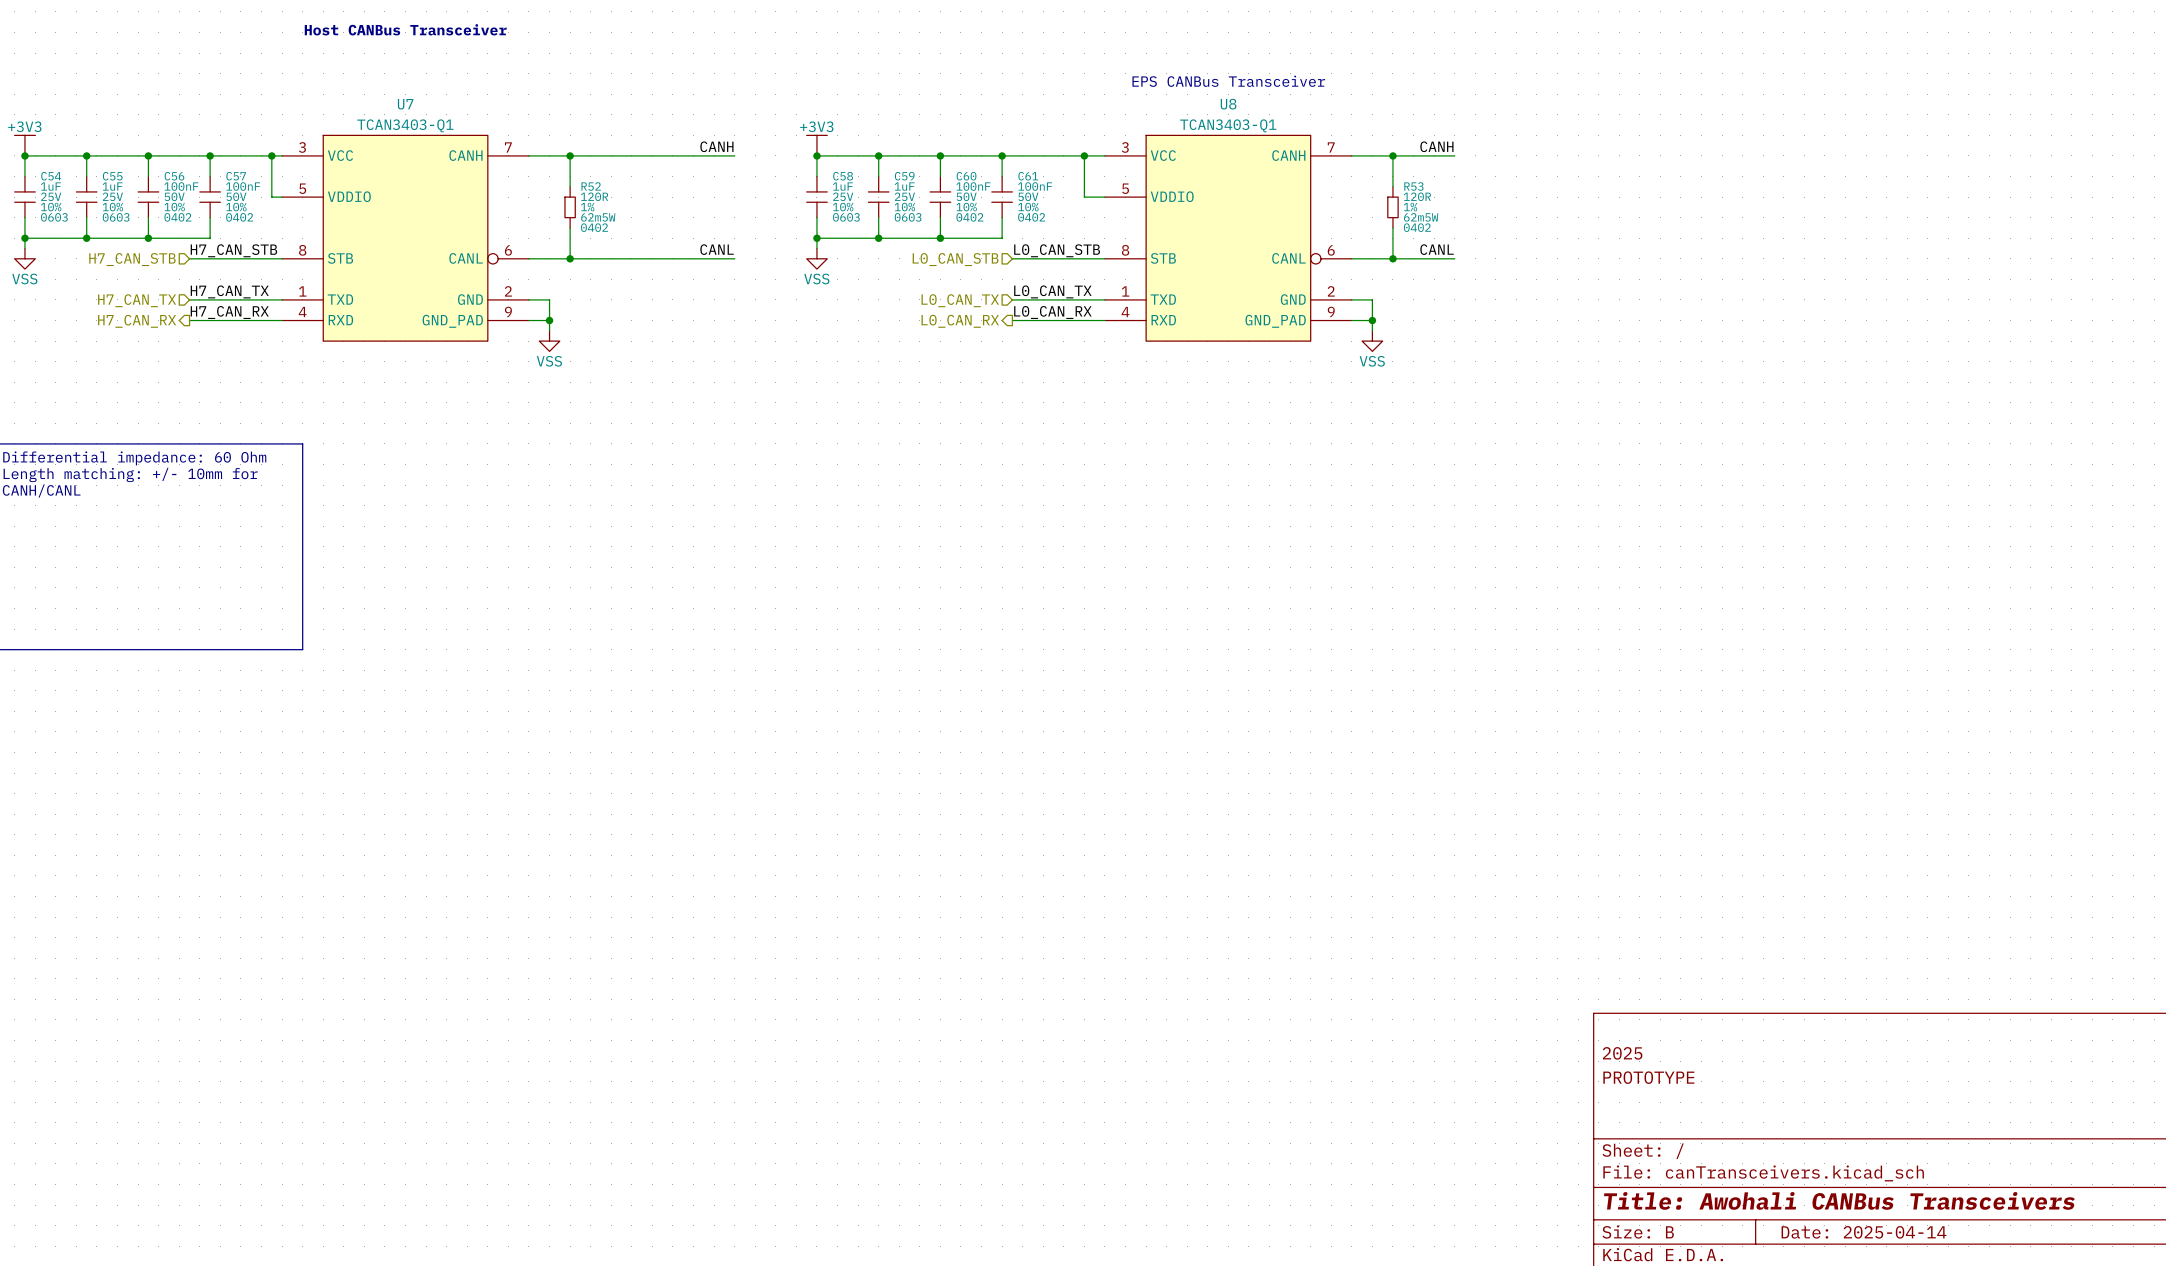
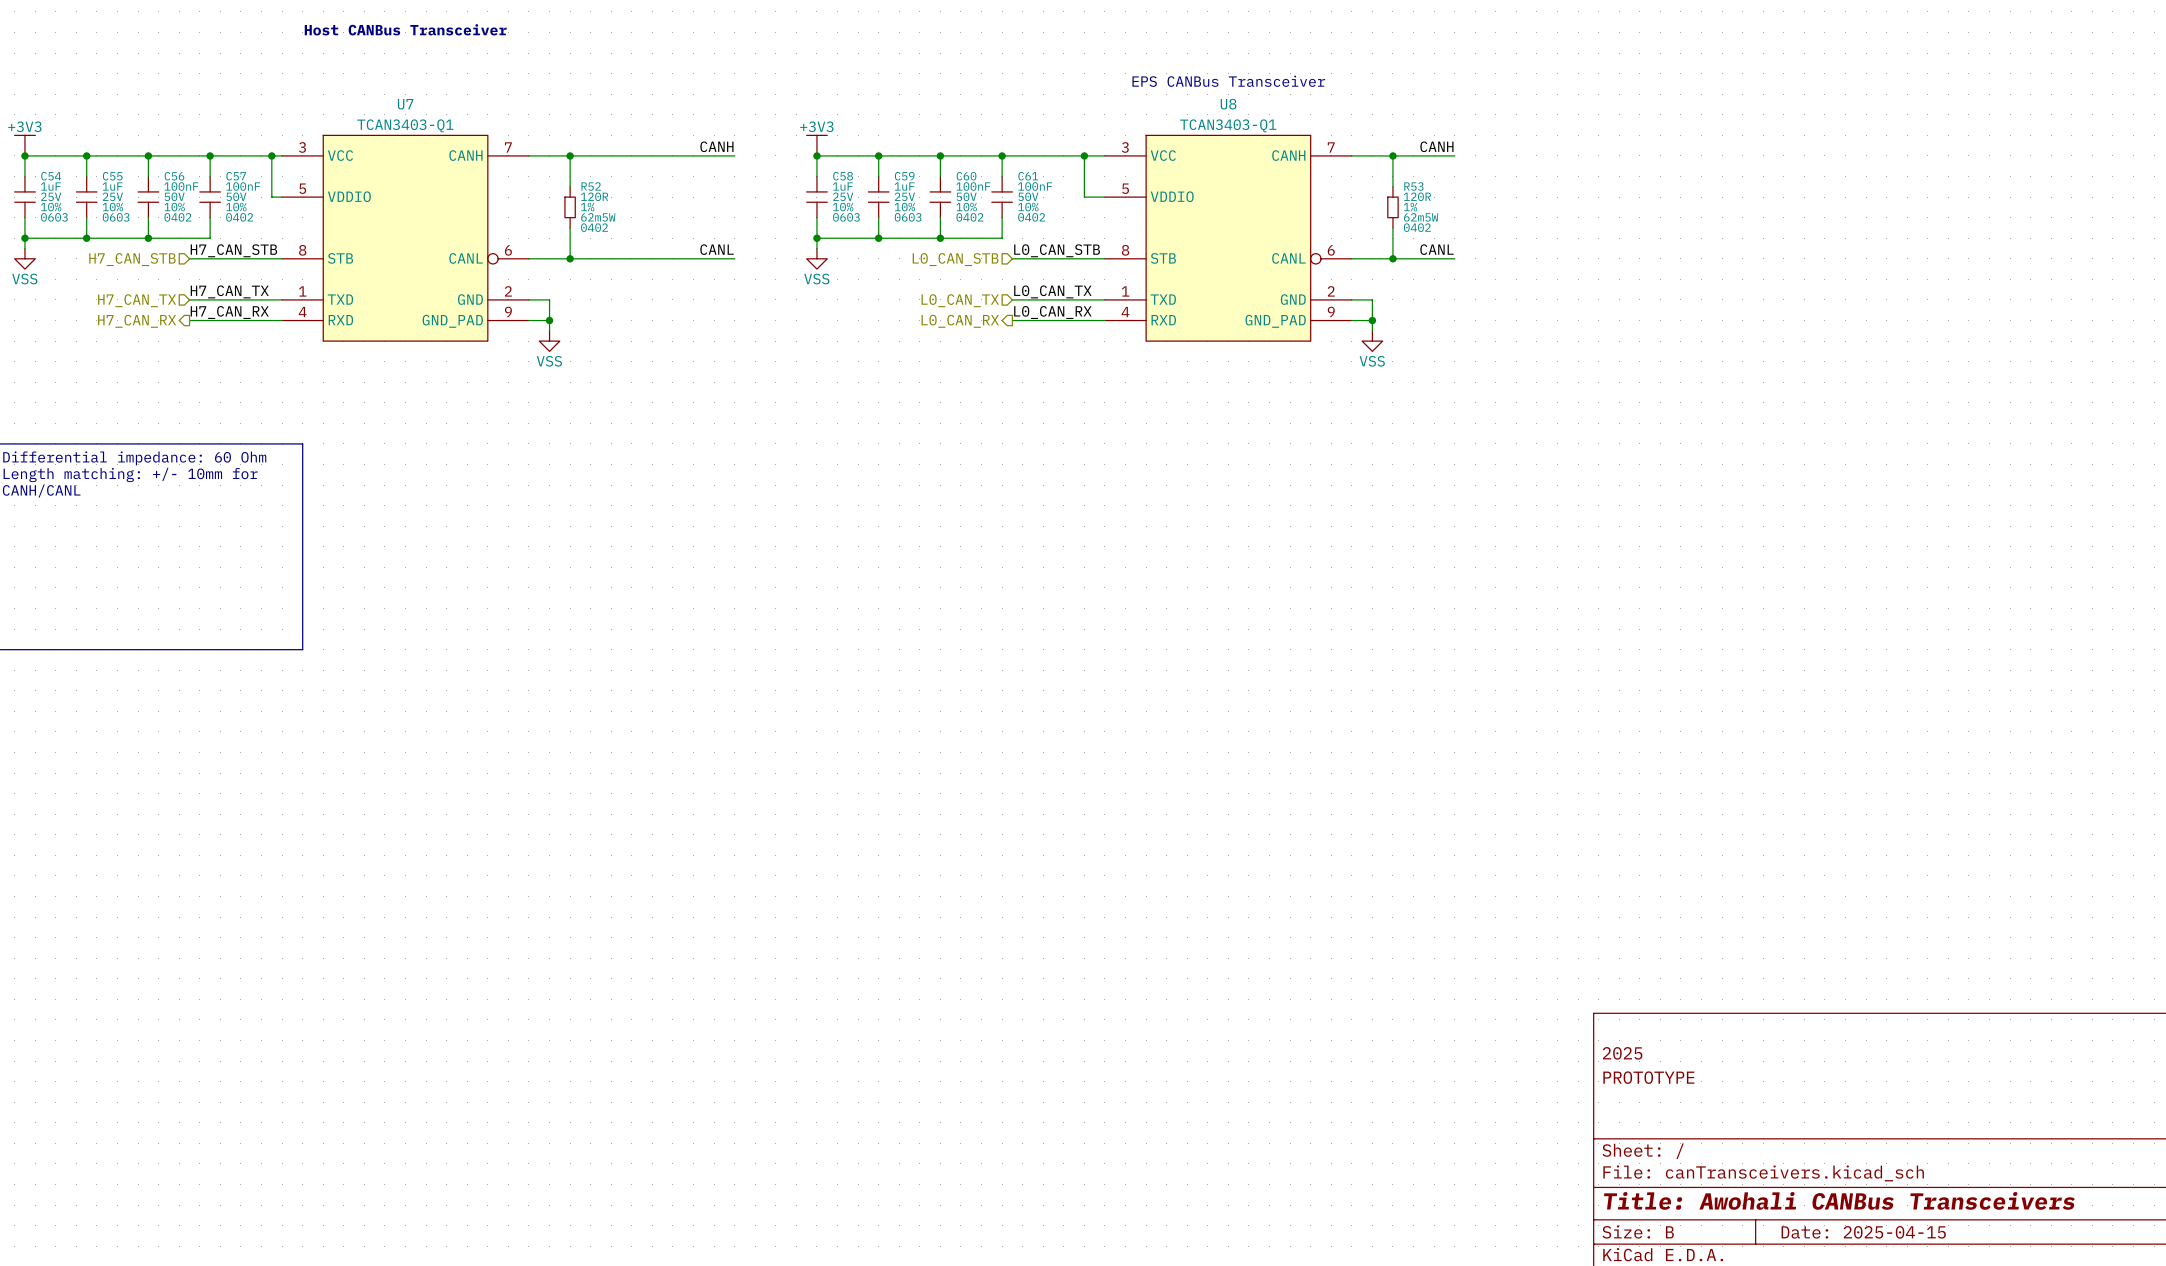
title block: Date: 2025-04-14 (1863, 1232) -> Date: 2025-04-15 (1863, 1232)

